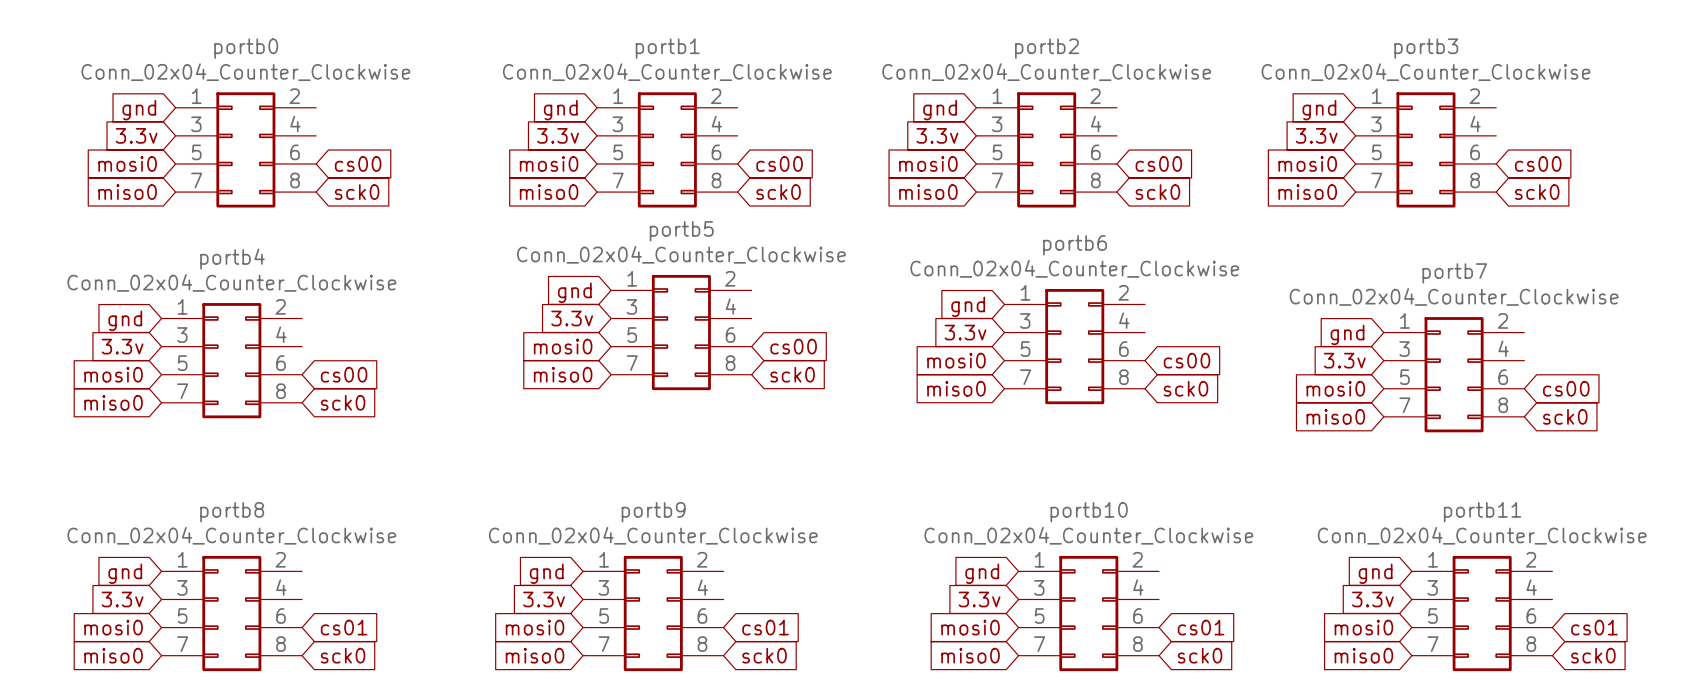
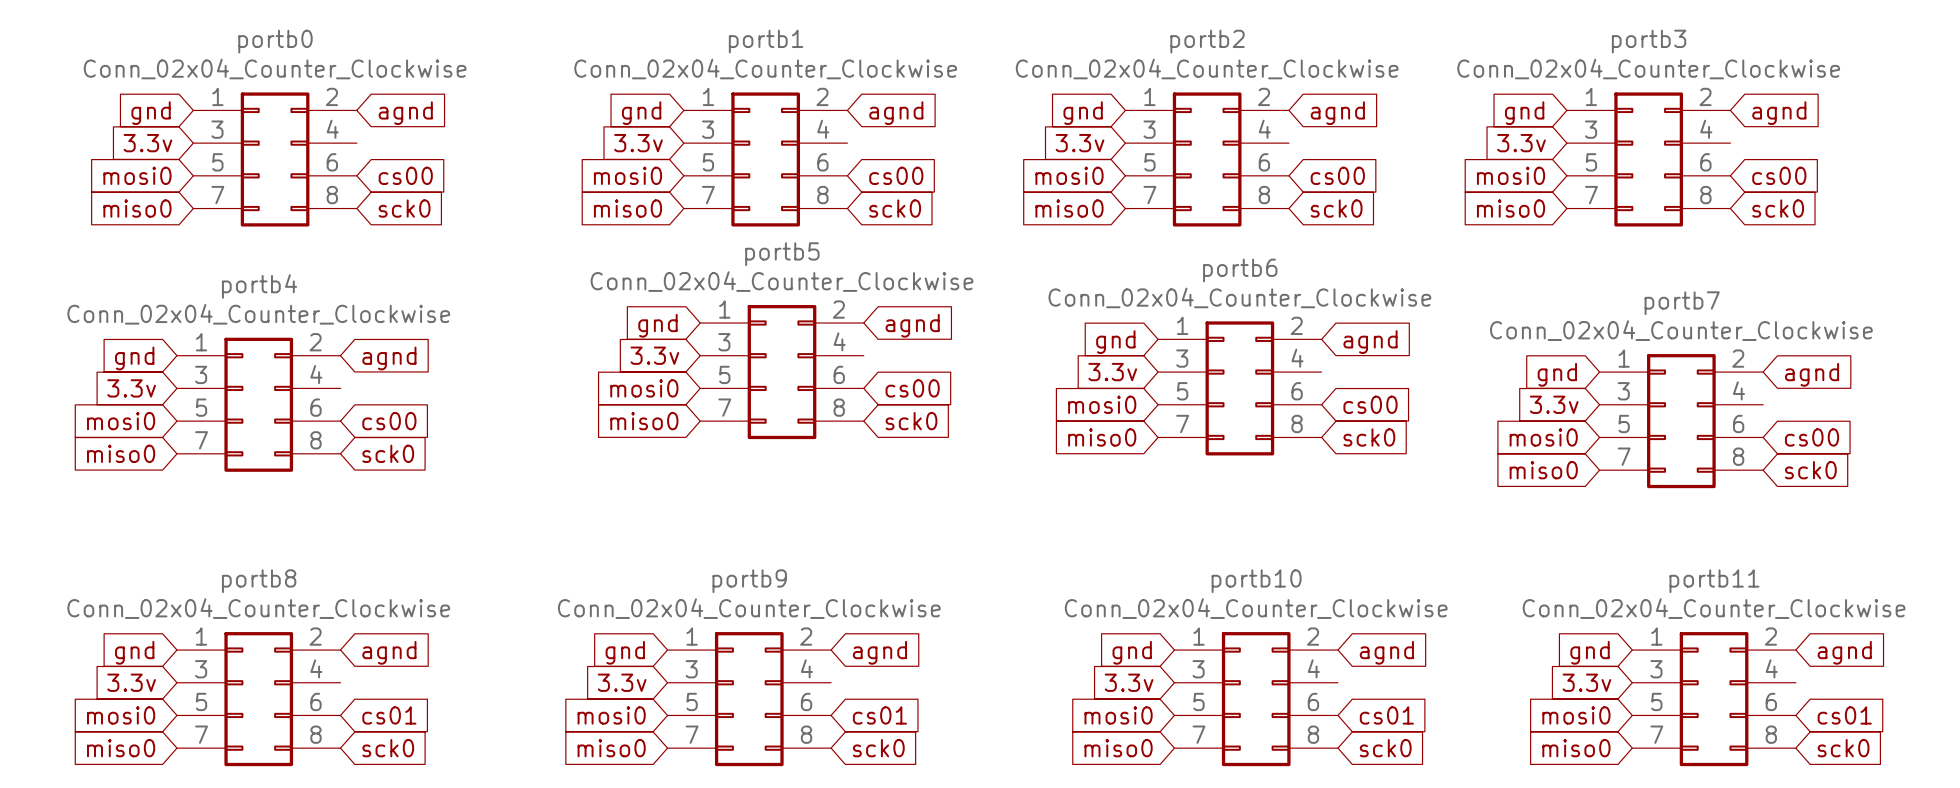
global label: none -> agnd (405, 113)
global label: none -> agnd (896, 113)
global label: none -> agnd (1337, 113)
global label: none -> agnd (1779, 113)
global label: none -> agnd (912, 325)
global label: none -> agnd (1370, 342)
global label: none -> agnd (389, 358)
global label: none -> agnd (1812, 374)
global label: none -> agnd (389, 652)
global label: none -> agnd (879, 652)
global label: none -> agnd (1386, 652)
global label: none -> agnd (1844, 652)

